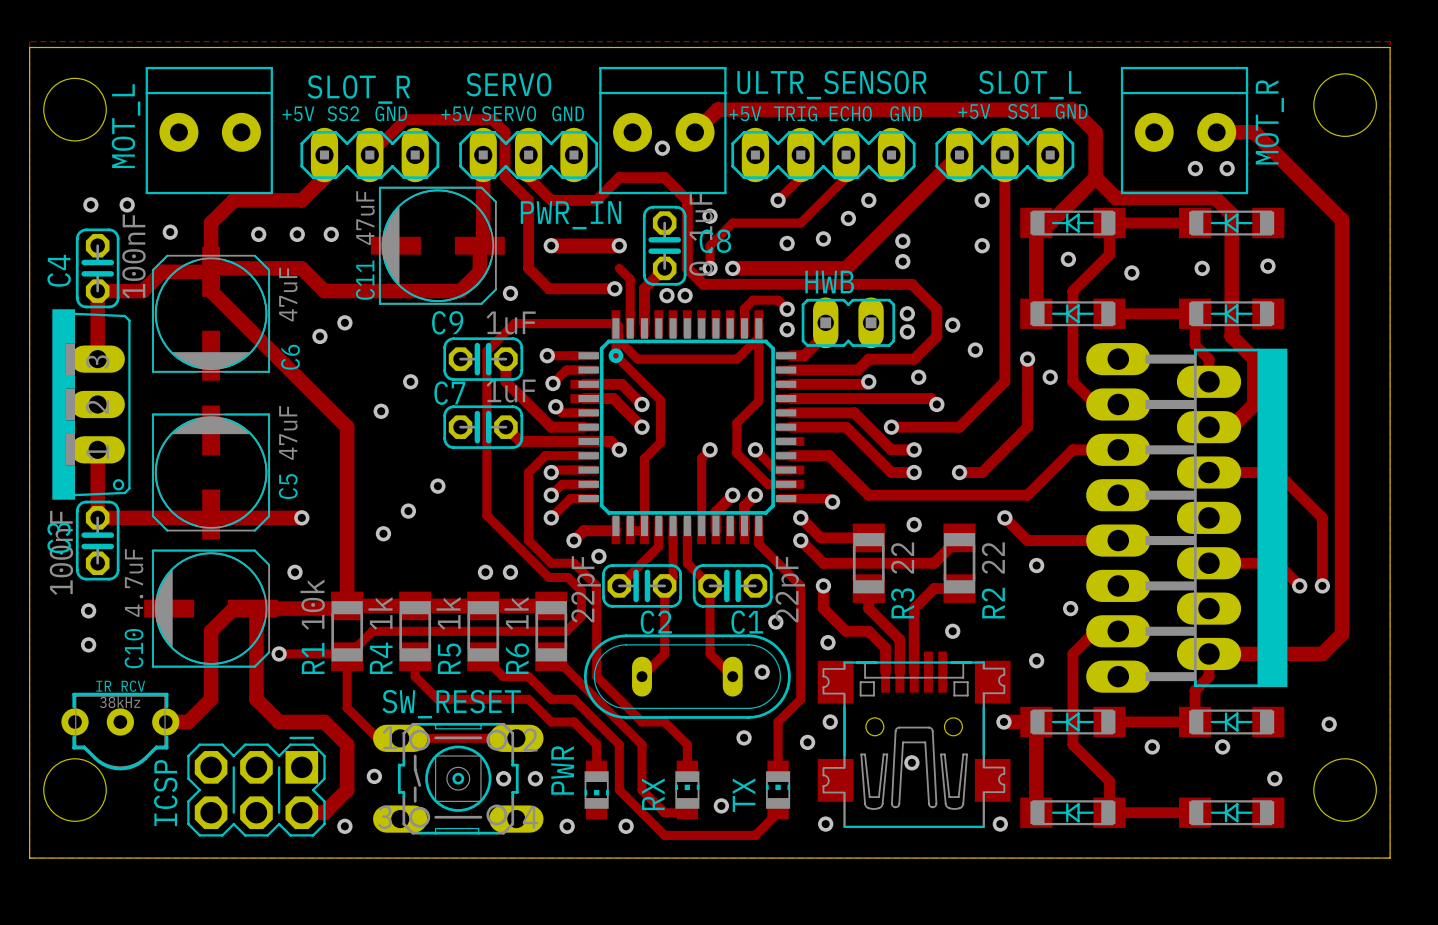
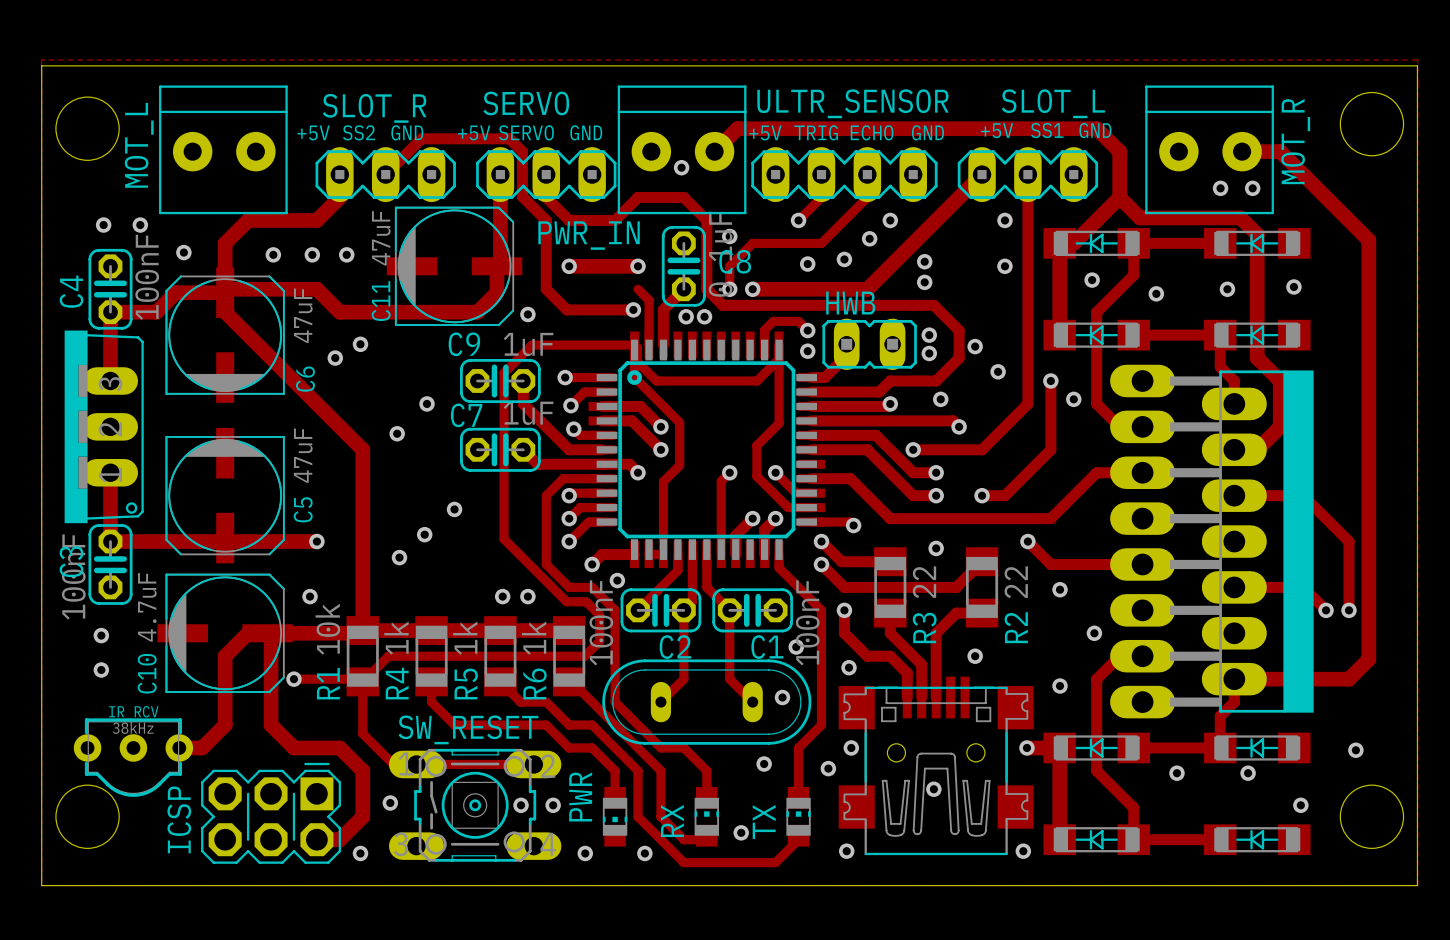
C2 value: 22pF (586, 589) -> 100nF (601, 622)
C1 value: 22pF (790, 589) -> 100nF (807, 622)

